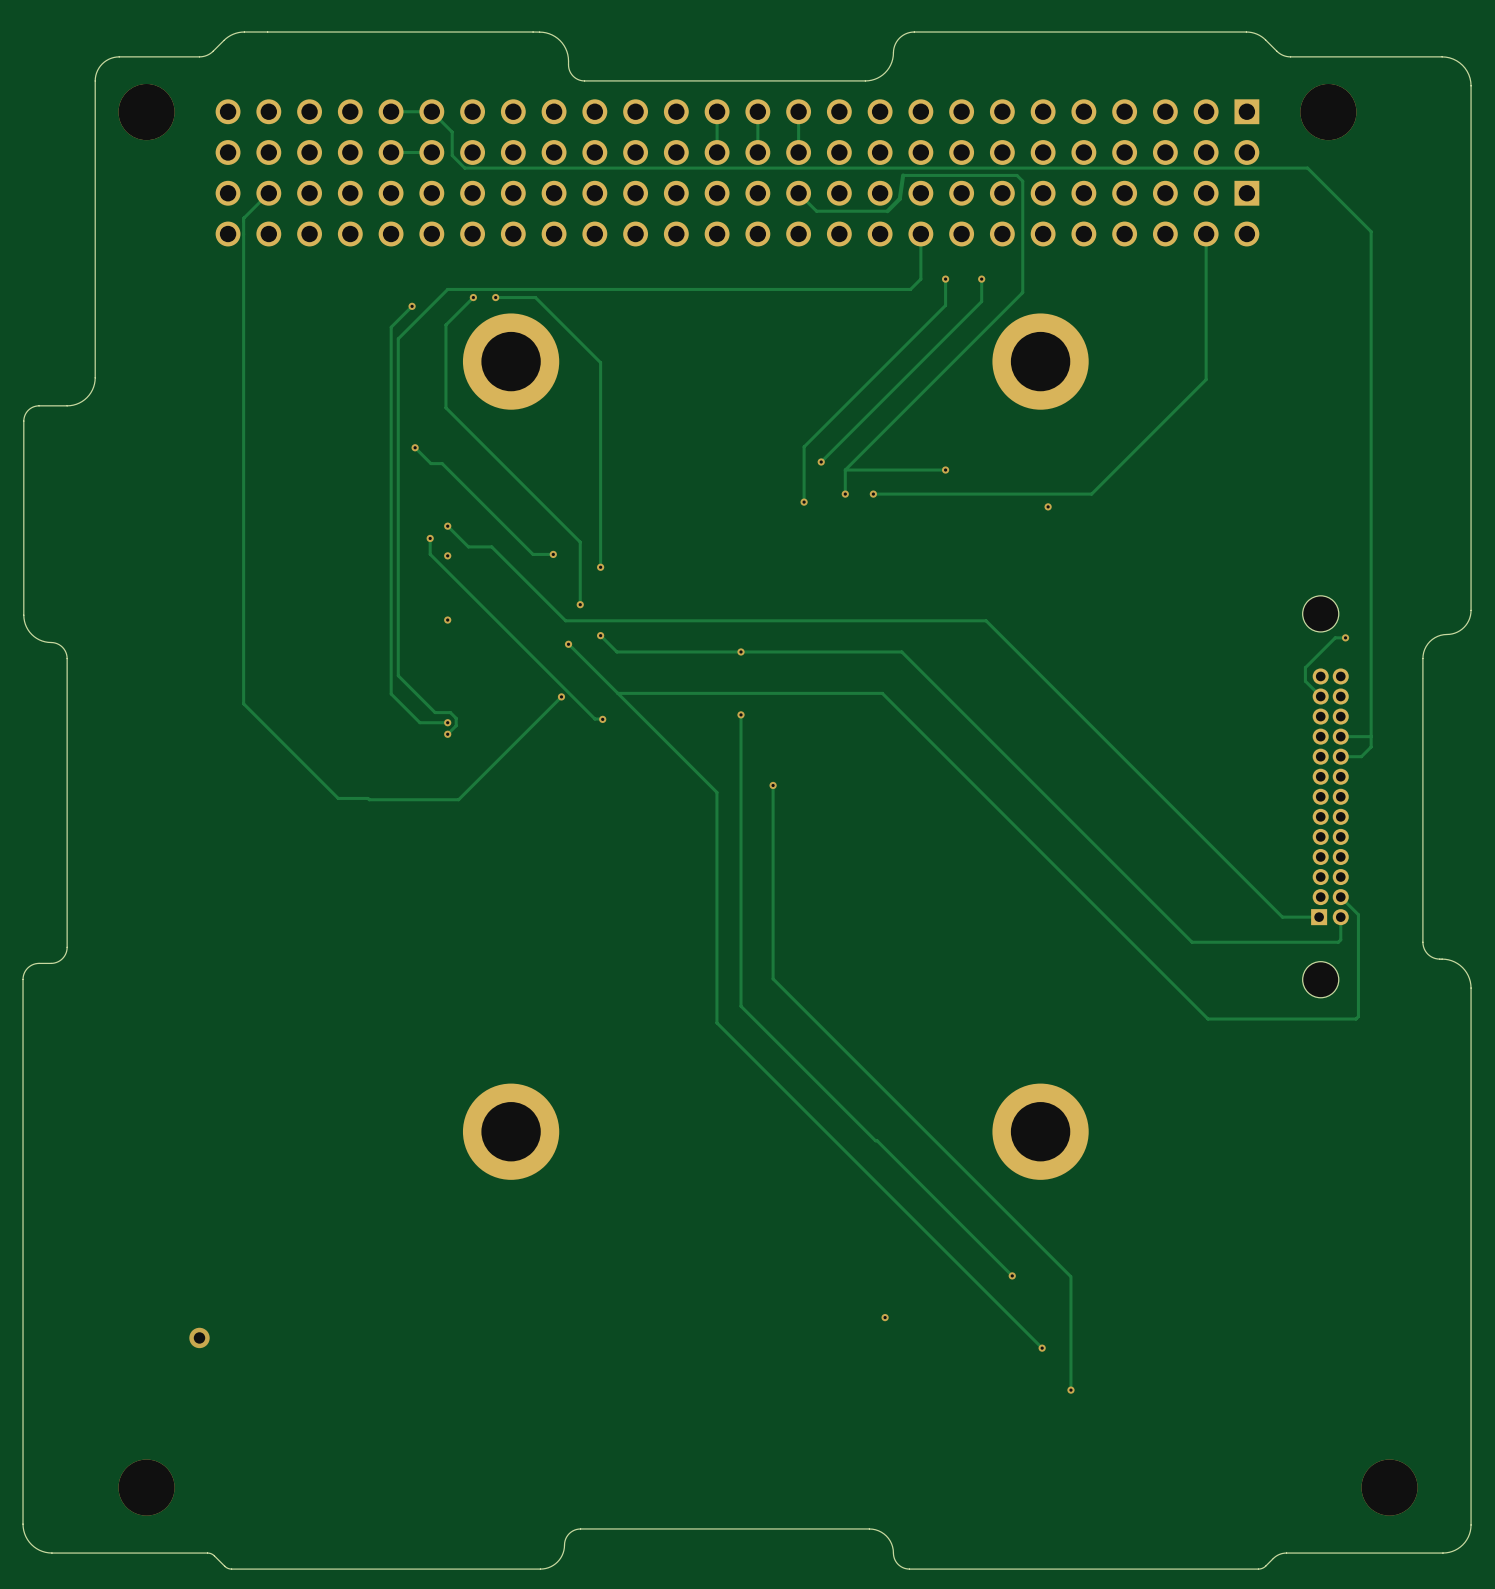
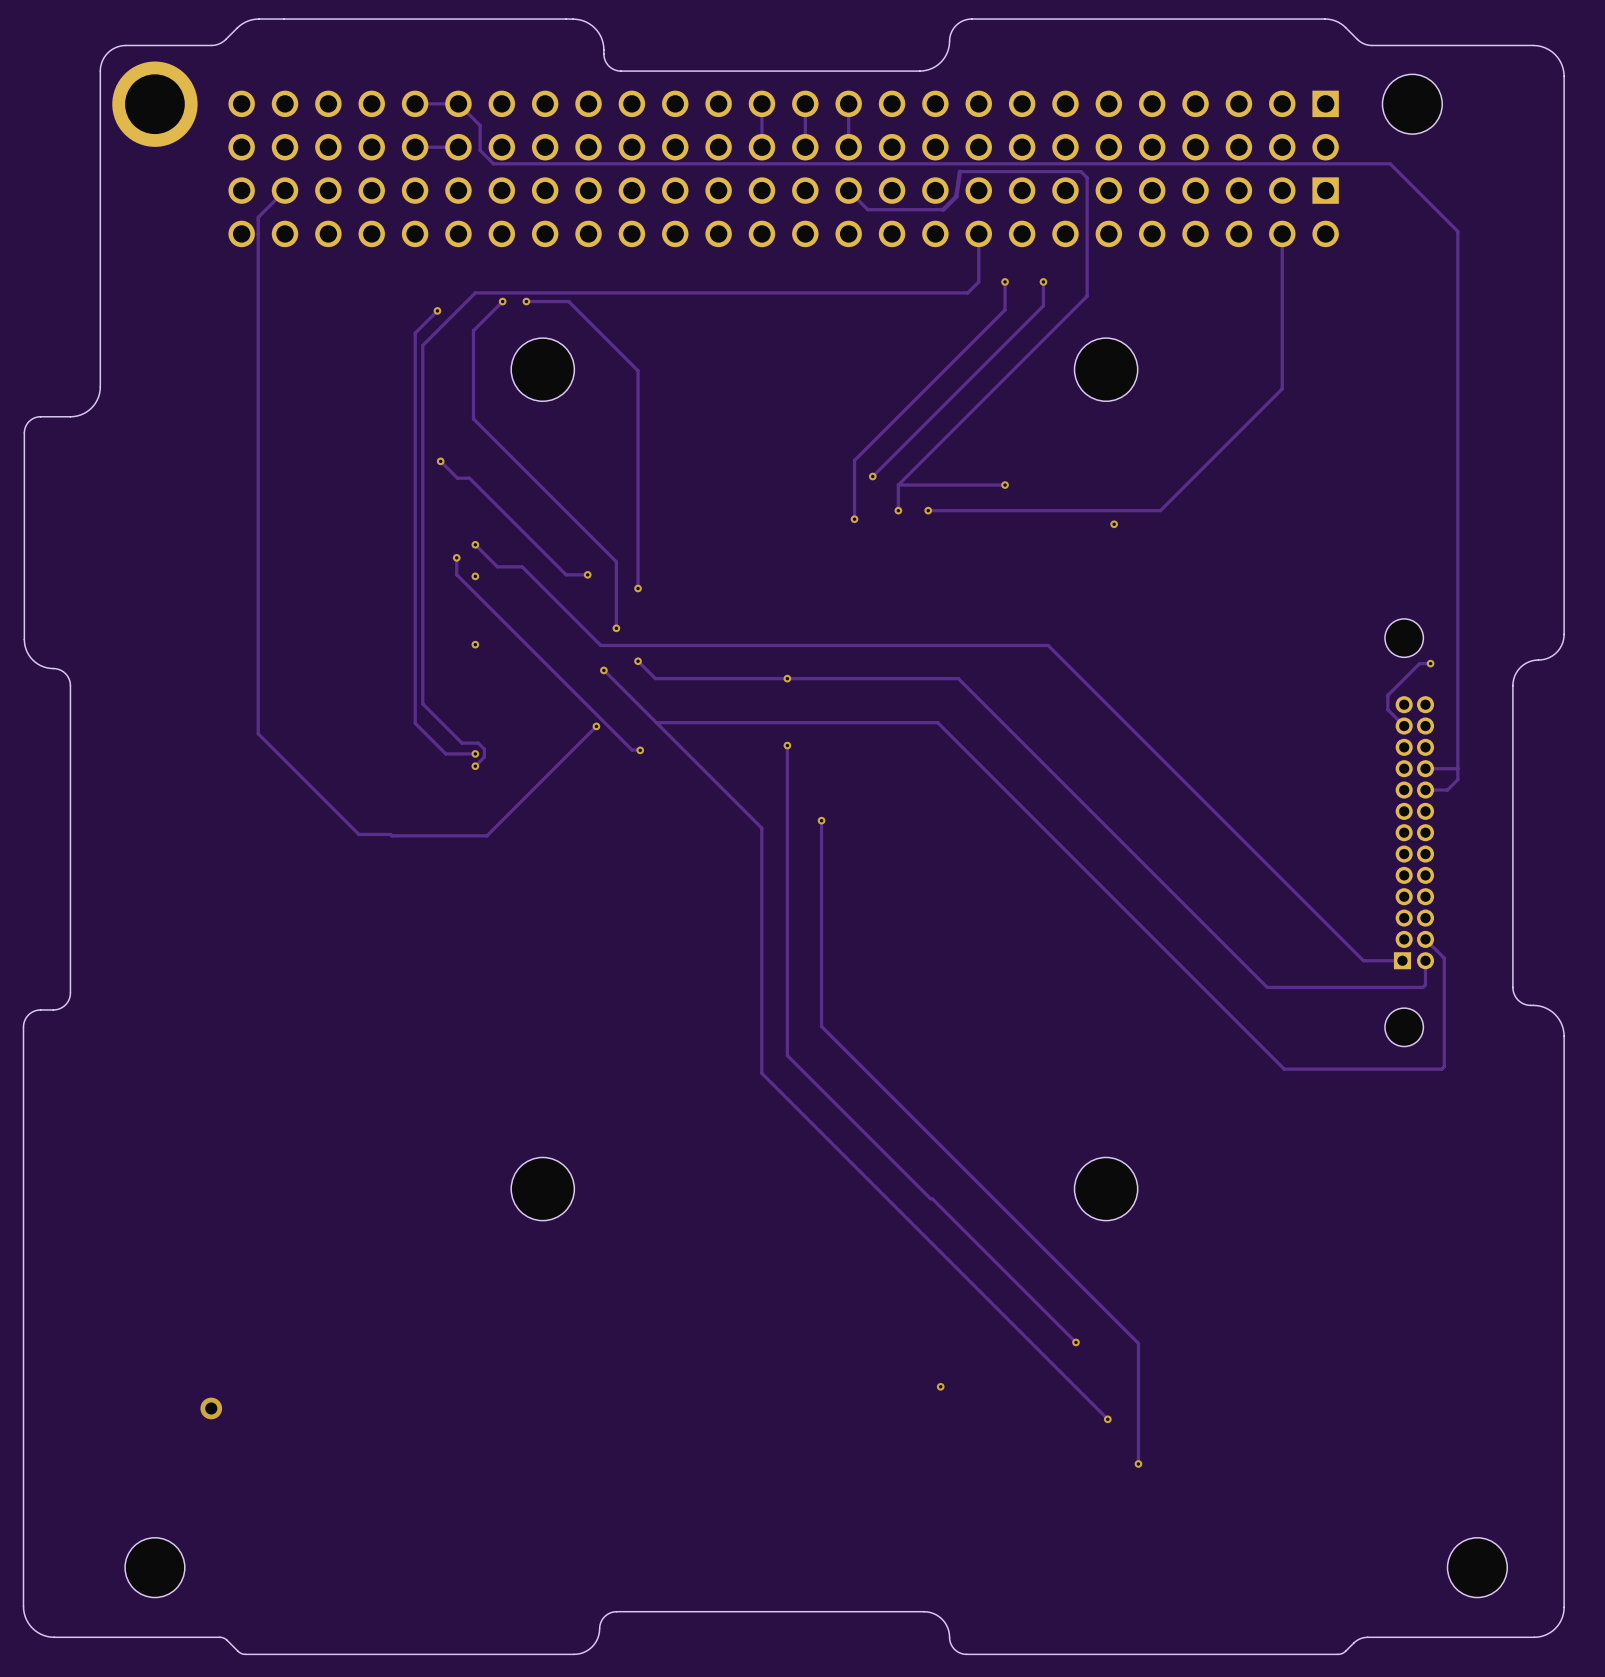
part footprint: [118, 83, 175, 141] -> [112, 61, 198, 147]
part footprint: [1300, 83, 1357, 141] -> [1382, 74, 1443, 135]
part footprint: [462, 313, 560, 410] -> [511, 338, 575, 402]
part footprint: [992, 313, 1089, 410] -> [1074, 338, 1138, 402]
part footprint: [462, 1083, 560, 1180] -> [511, 1157, 575, 1221]
part footprint: [992, 1083, 1089, 1180] -> [1074, 1157, 1138, 1221]
part footprint: [118, 1459, 175, 1516] -> [125, 1537, 185, 1598]
part footprint: [1361, 1459, 1418, 1516] -> [1447, 1537, 1508, 1598]

